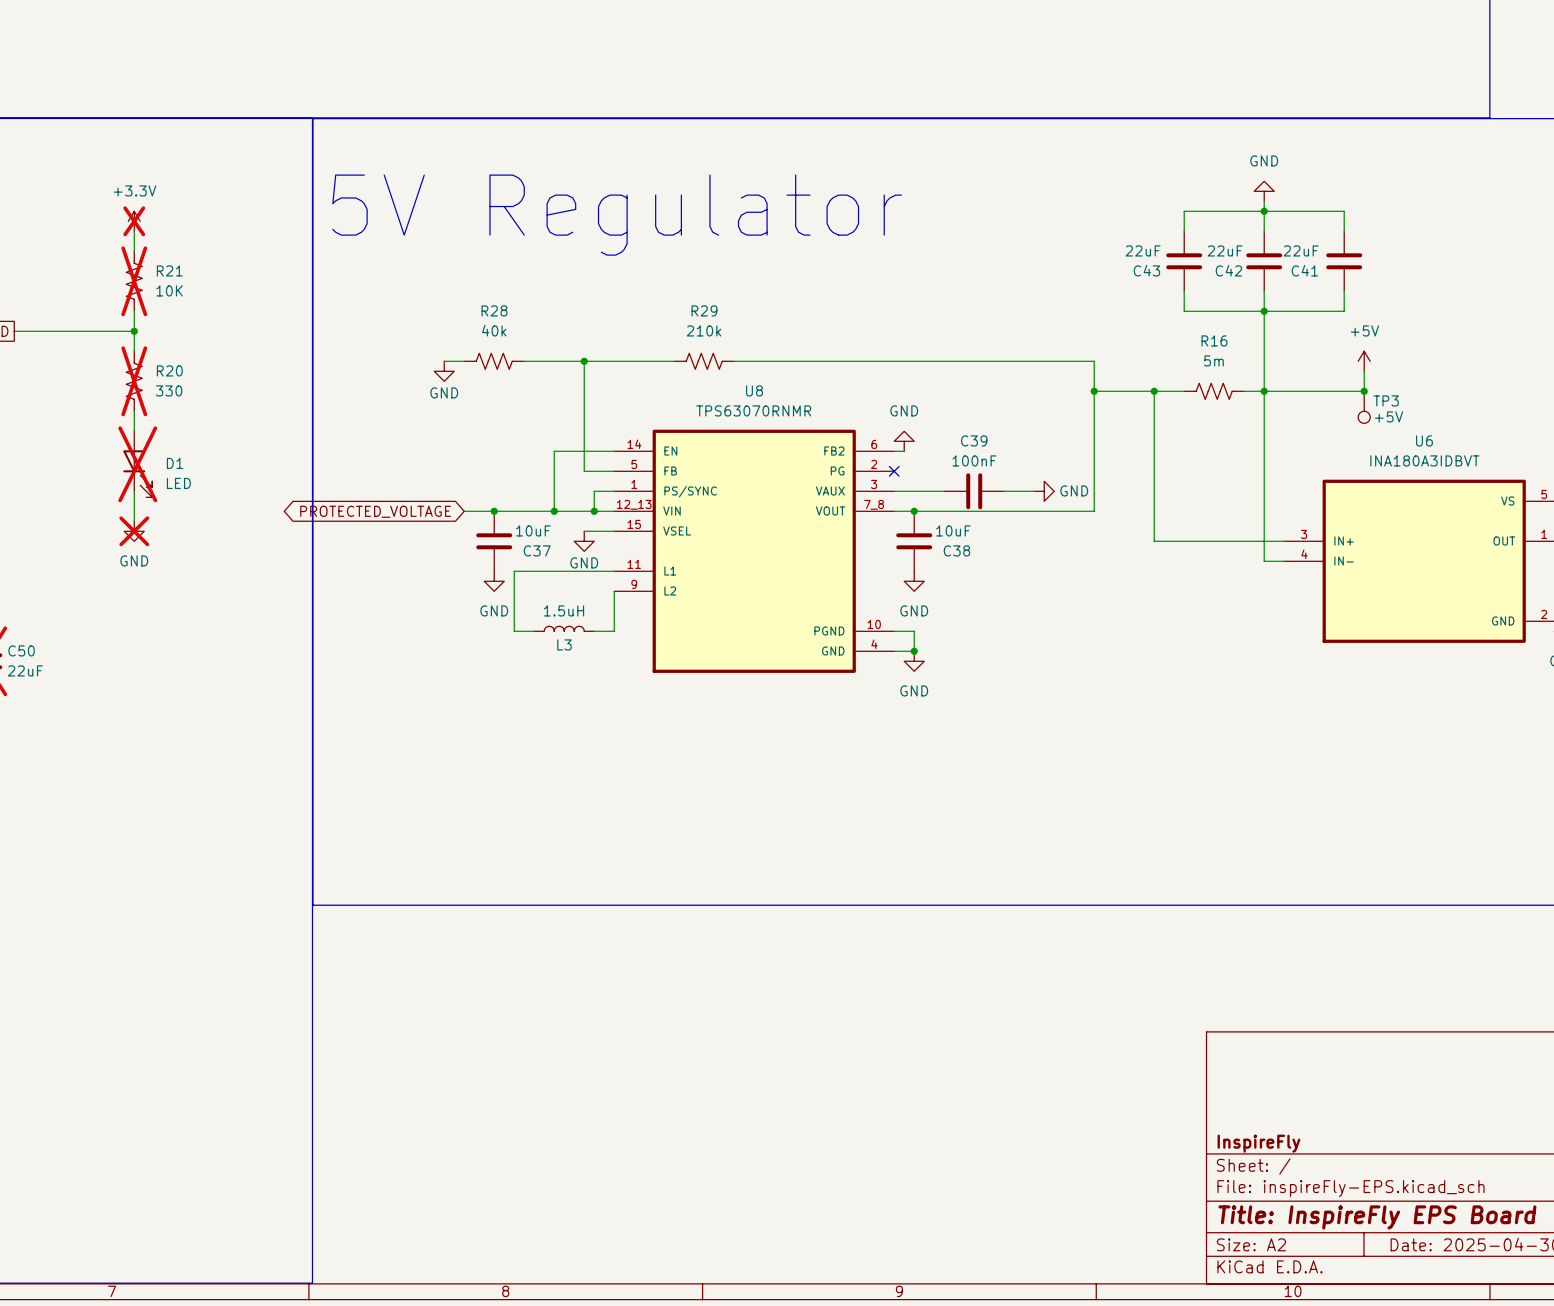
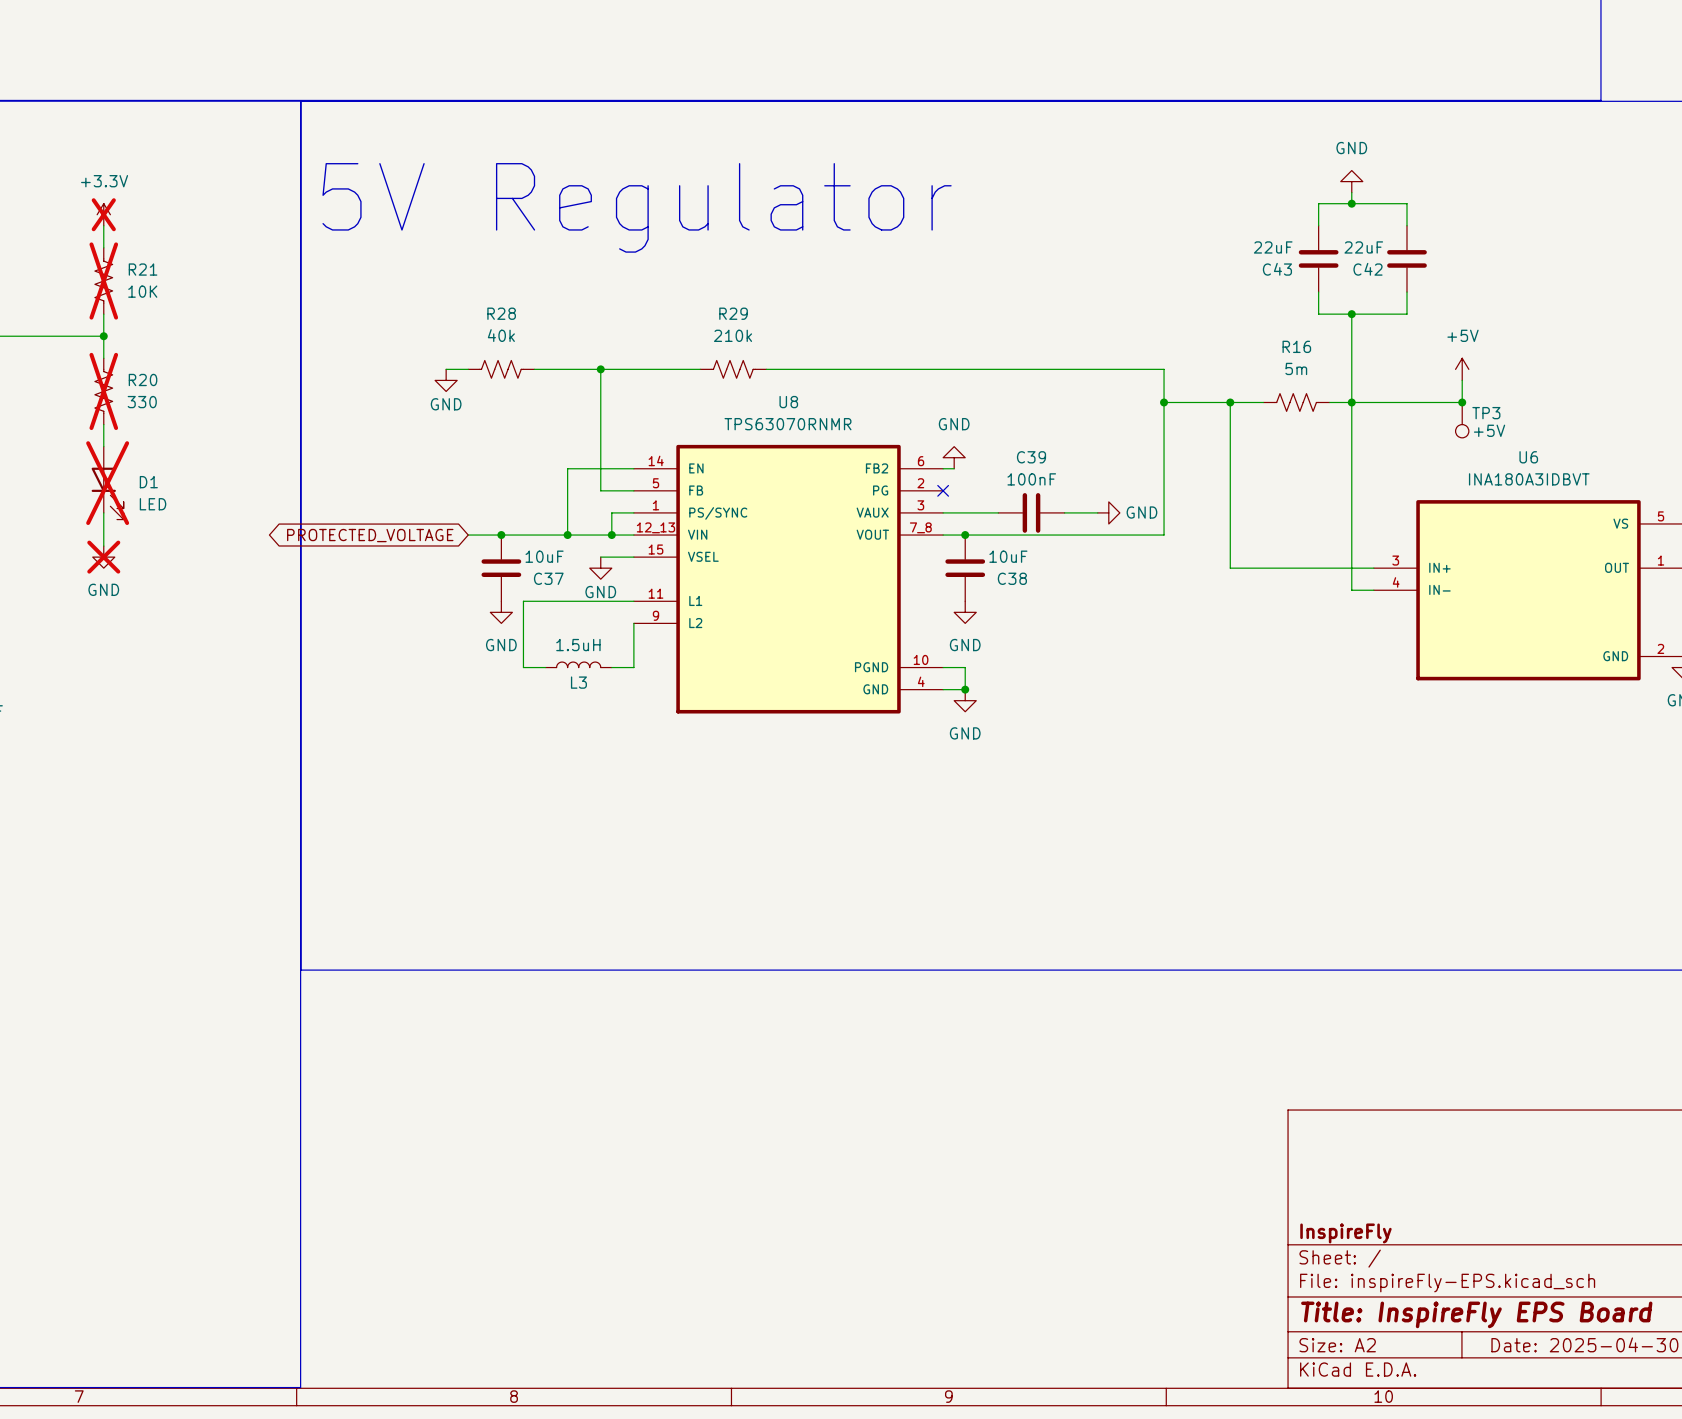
wire: (1234, 211) (1184, 211) (1184, 231) -> (1318, 203) (1318, 225)
wire: (1264, 211) (1264, 231) -> none
wire: (1314, 211) (1344, 211) (1344, 231) -> (1406, 203) (1406, 225)
C43 position: (1184, 261) -> (1318, 258)
C42 position: (1264, 261) -> (1406, 258)
C41: 22uF (1344, 261) -> none
wire: (1184, 291) (1184, 311) (1234, 311) -> (1318, 292) (1318, 314)
wire: (1264, 291) (1264, 311) -> none
wire: (1344, 291) (1344, 311) (1314, 311) -> (1406, 292) (1406, 314)

